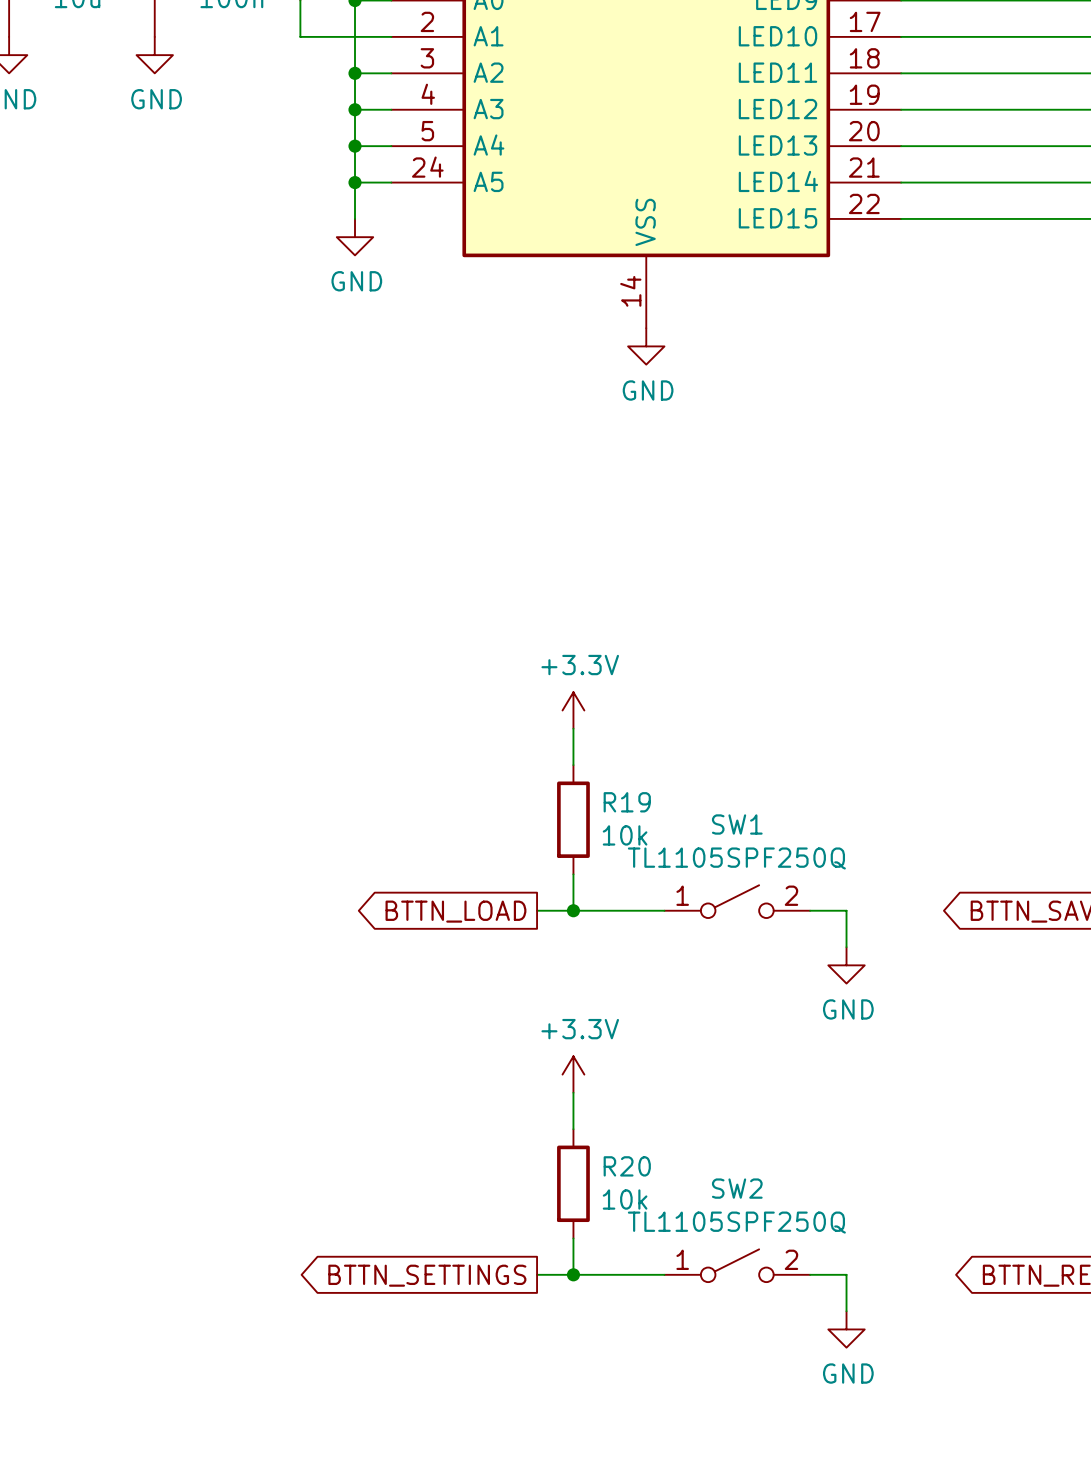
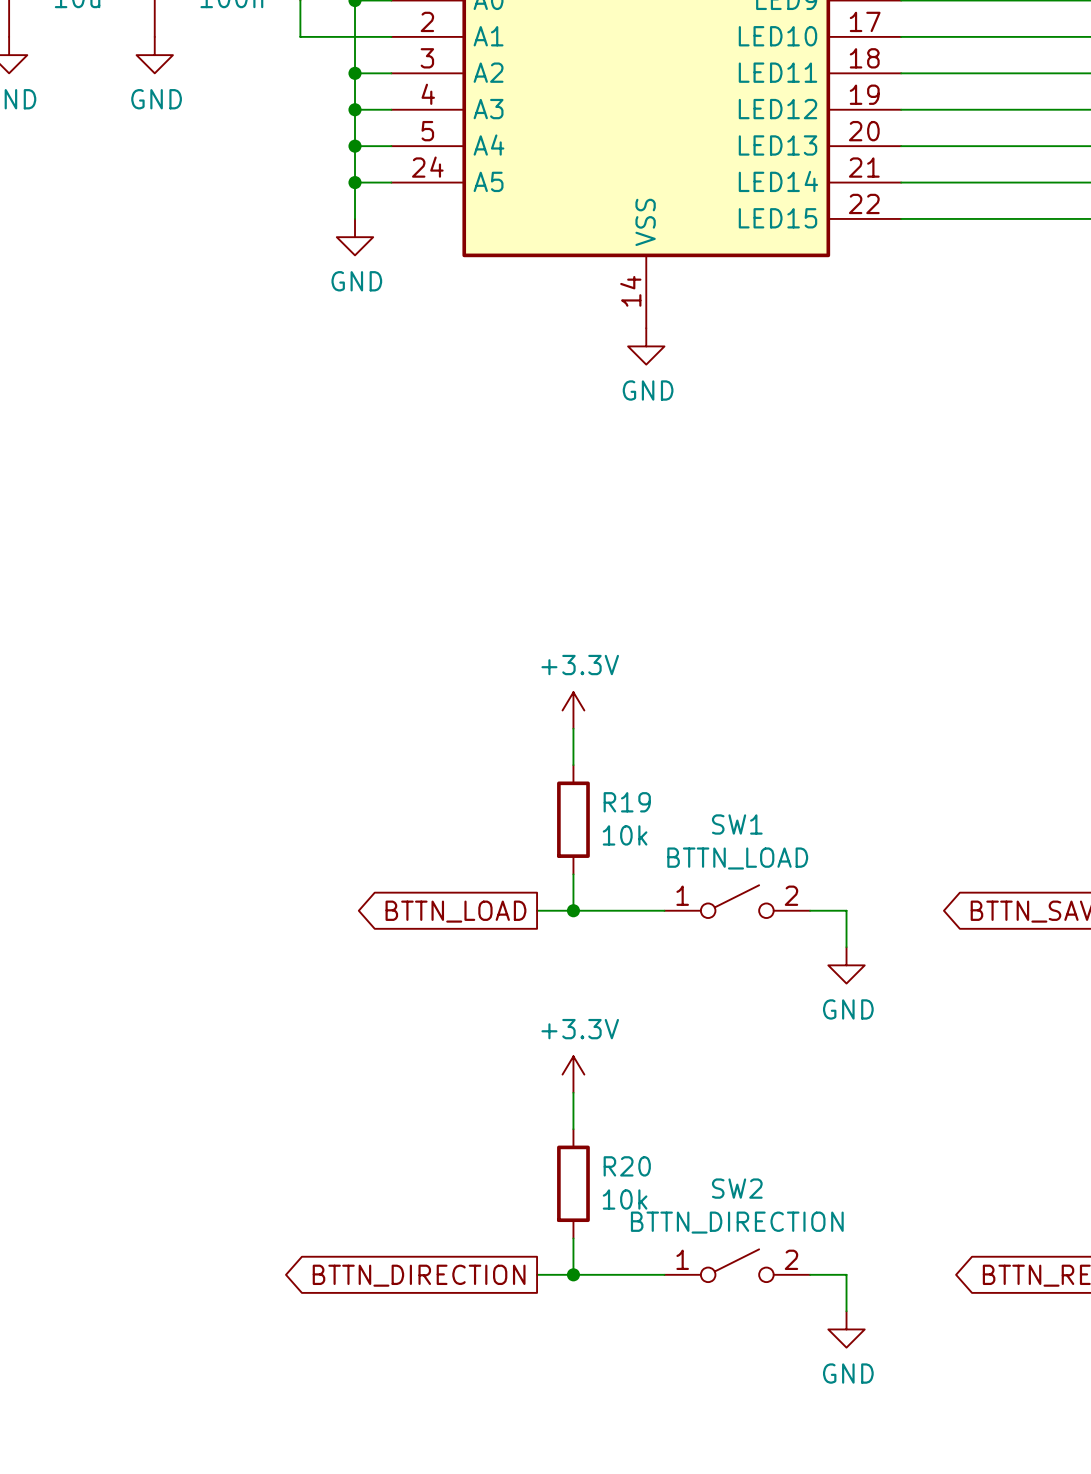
SW1 value: TL1105SPF250Q (736, 858) -> BTTN_LOAD (737, 858)
SW2 value: TL1105SPF250Q (736, 1222) -> BTTN_DIRECTION (737, 1222)
global label: BTTN_SETTINGS (427, 1275) -> BTTN_DIRECTION (419, 1275)

